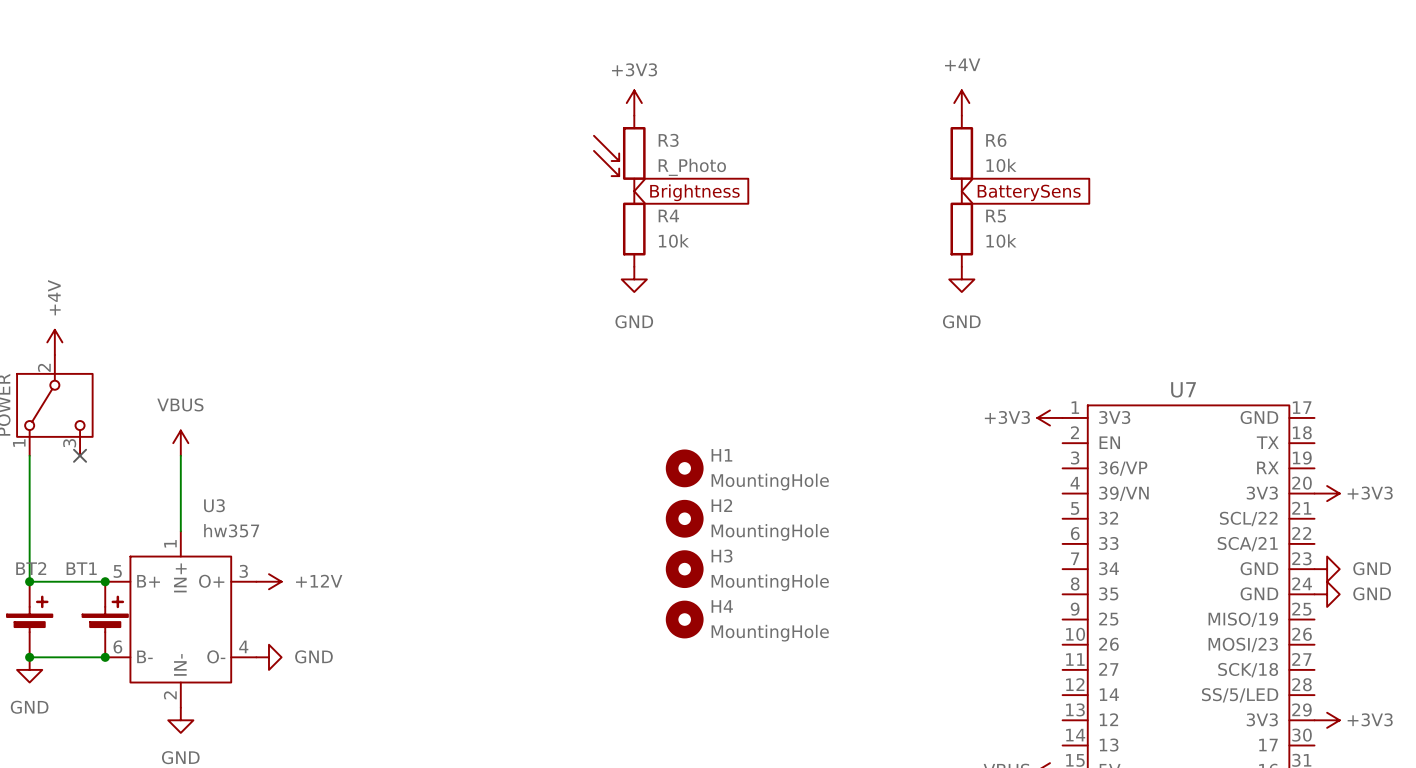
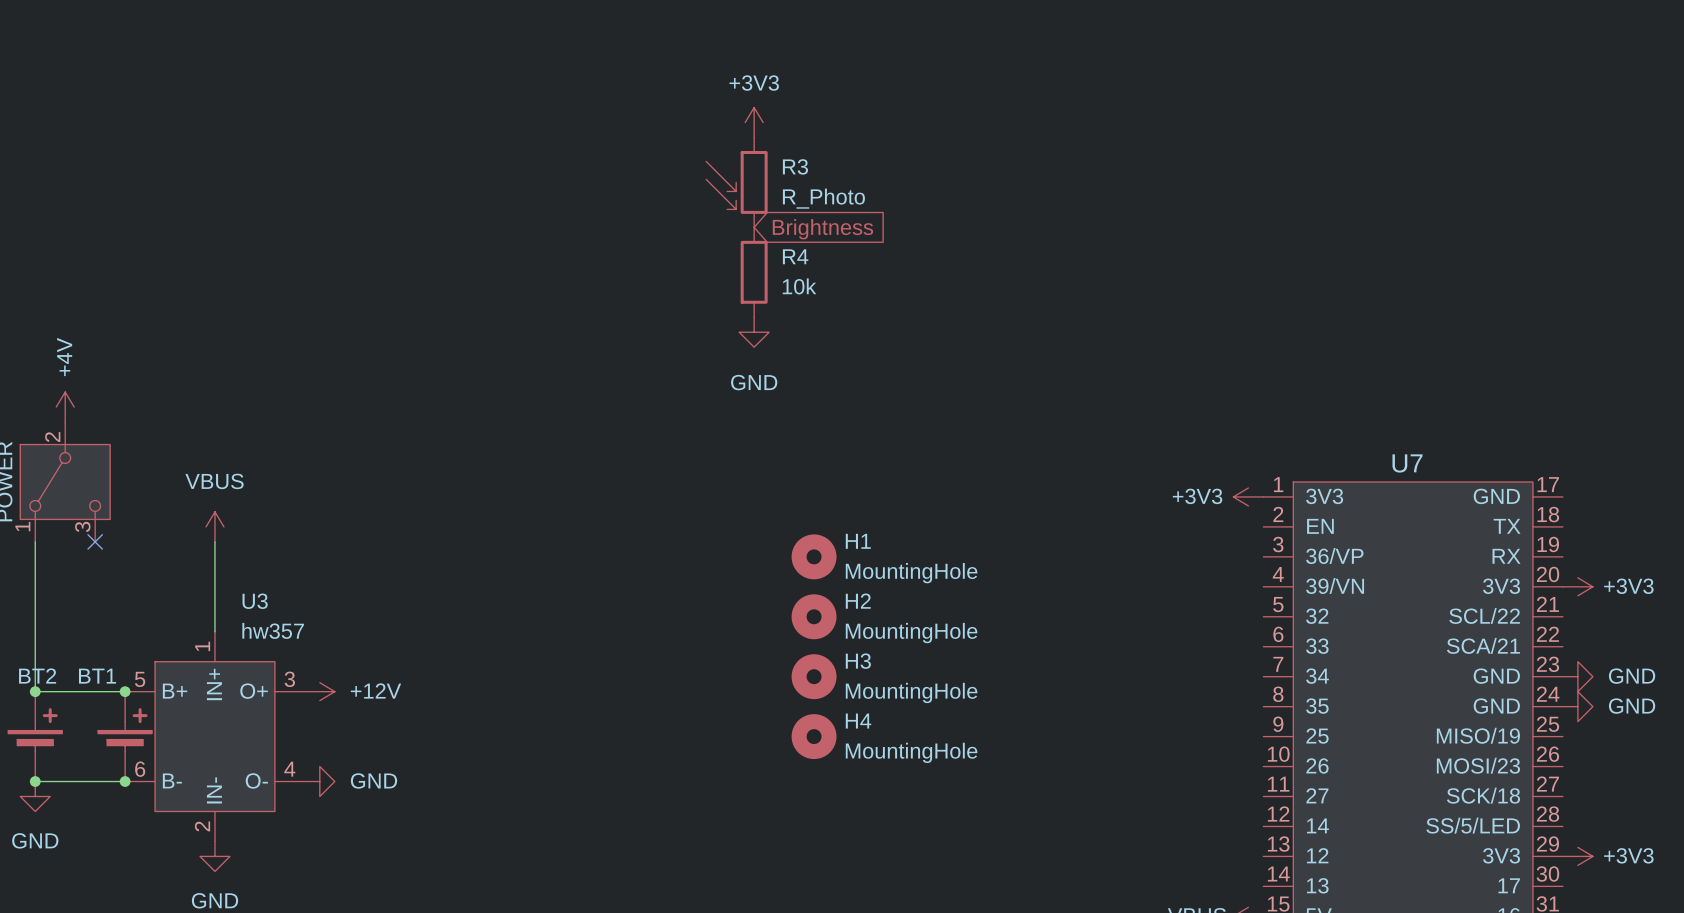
power symbol: +4V (961, 103) -> none
R6: 10k (961, 153) -> none
global label: BatterySens (1029, 192) -> none
R5: 10k (961, 229) -> none
power symbol: GND (961, 279) -> none

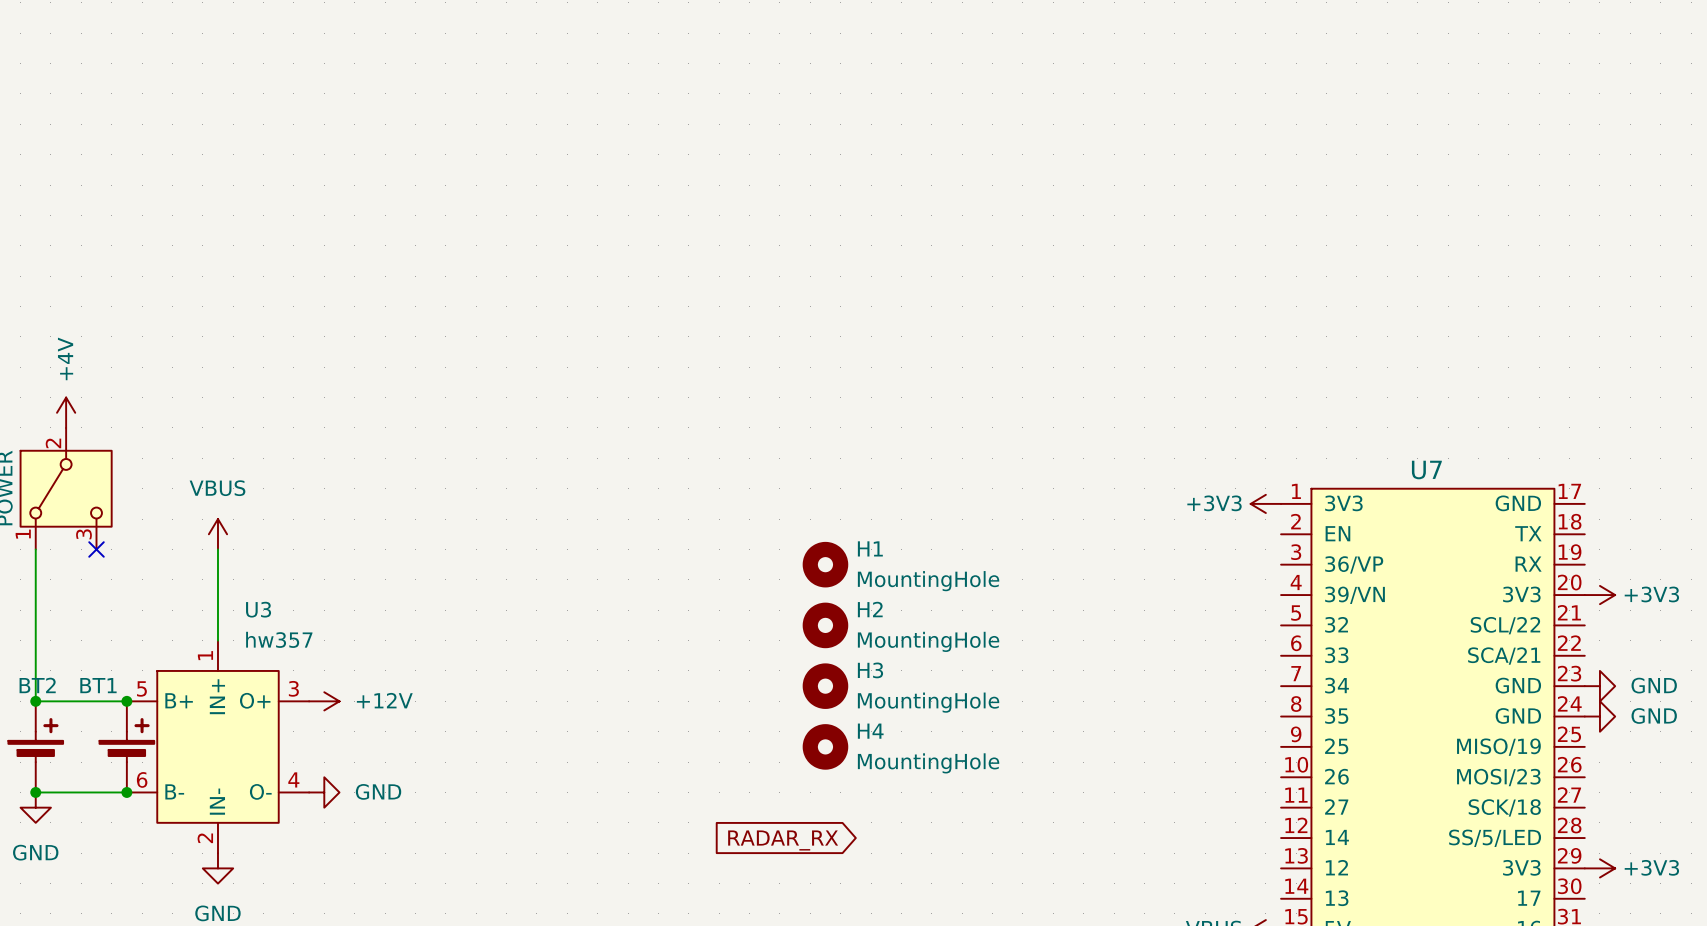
power symbol: +3V3 (754, 122) -> none
R3: R_Photo (736, 182) -> none
global label: Brightness (822, 229) -> none
R4: 10k (754, 272) -> none
power symbol: GND (754, 332) -> none
global label: none -> RADAR_RX (783, 840)

